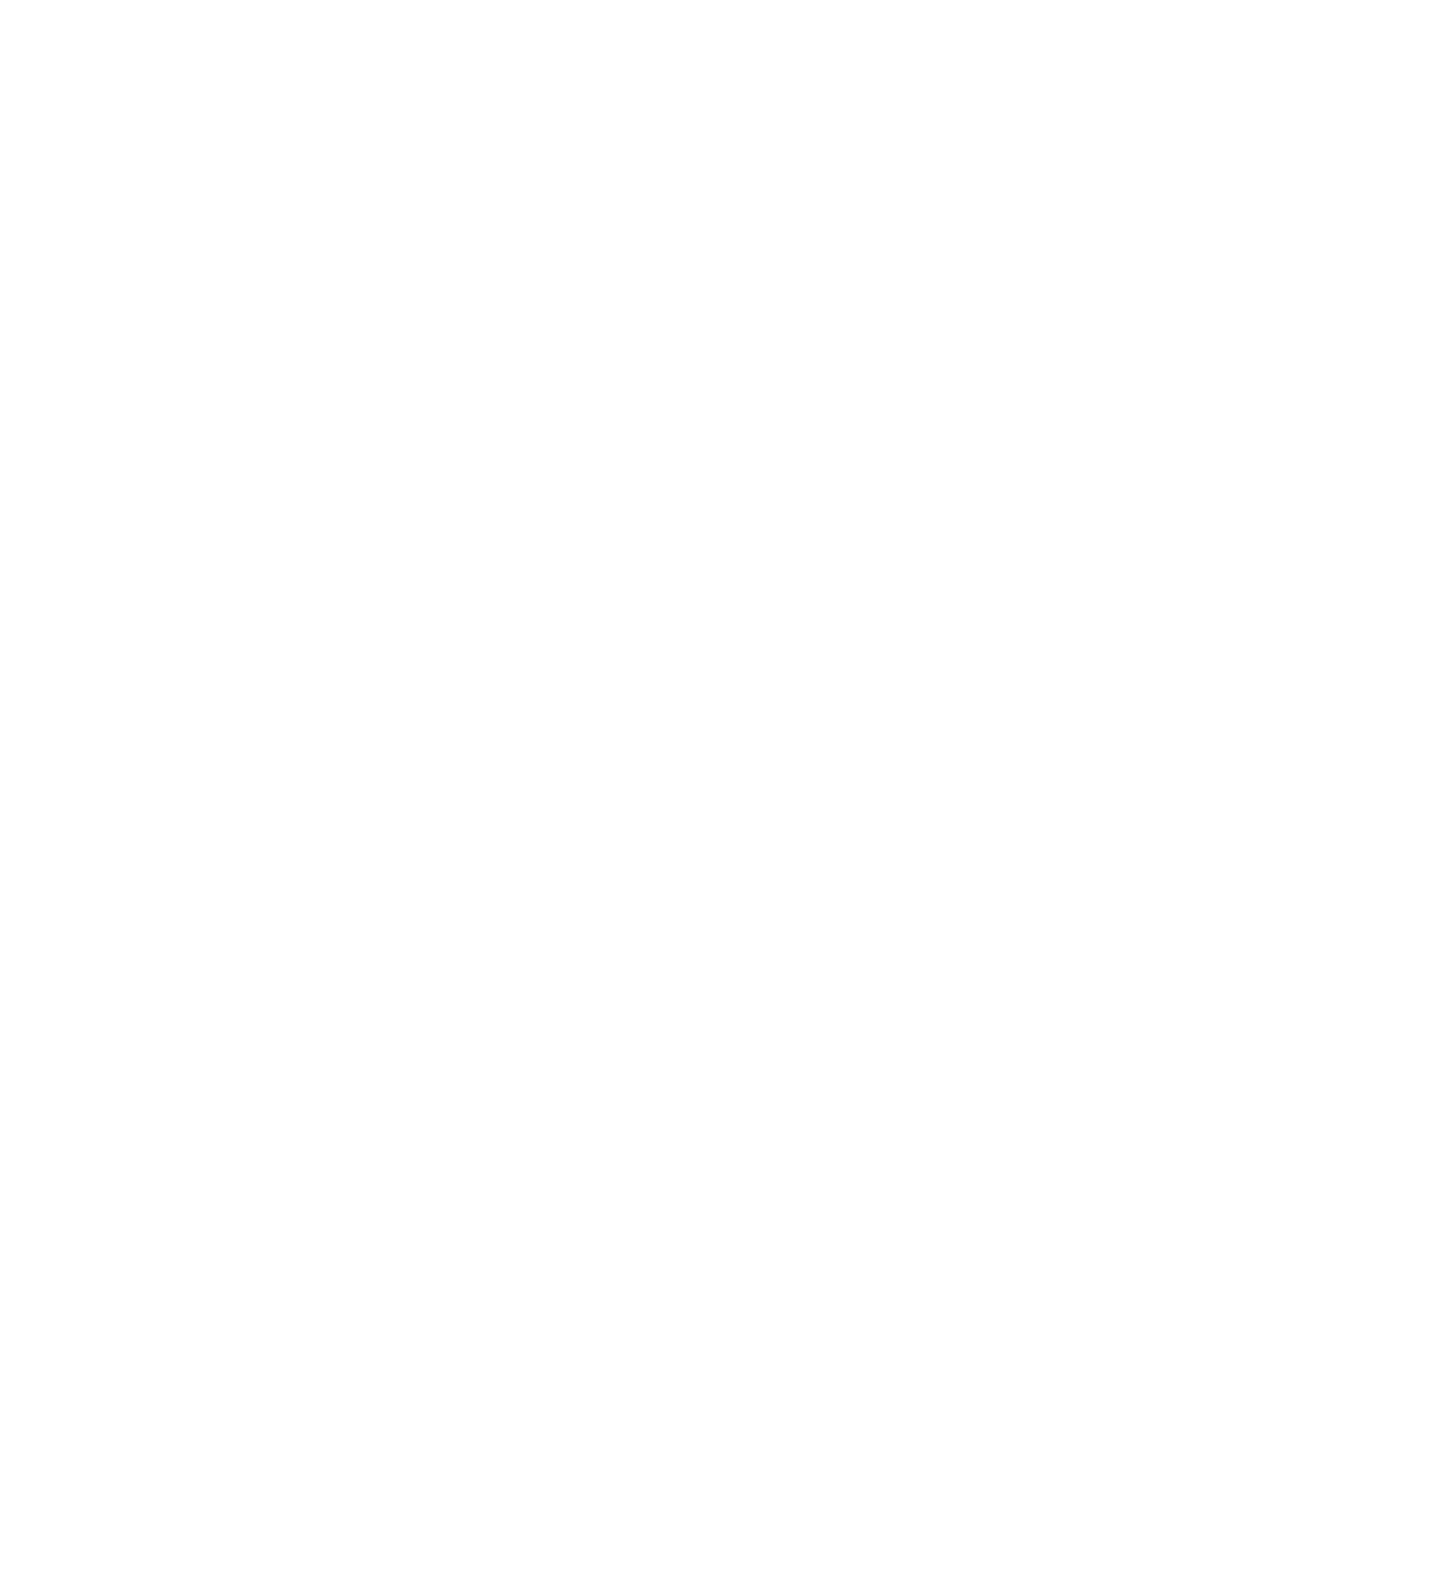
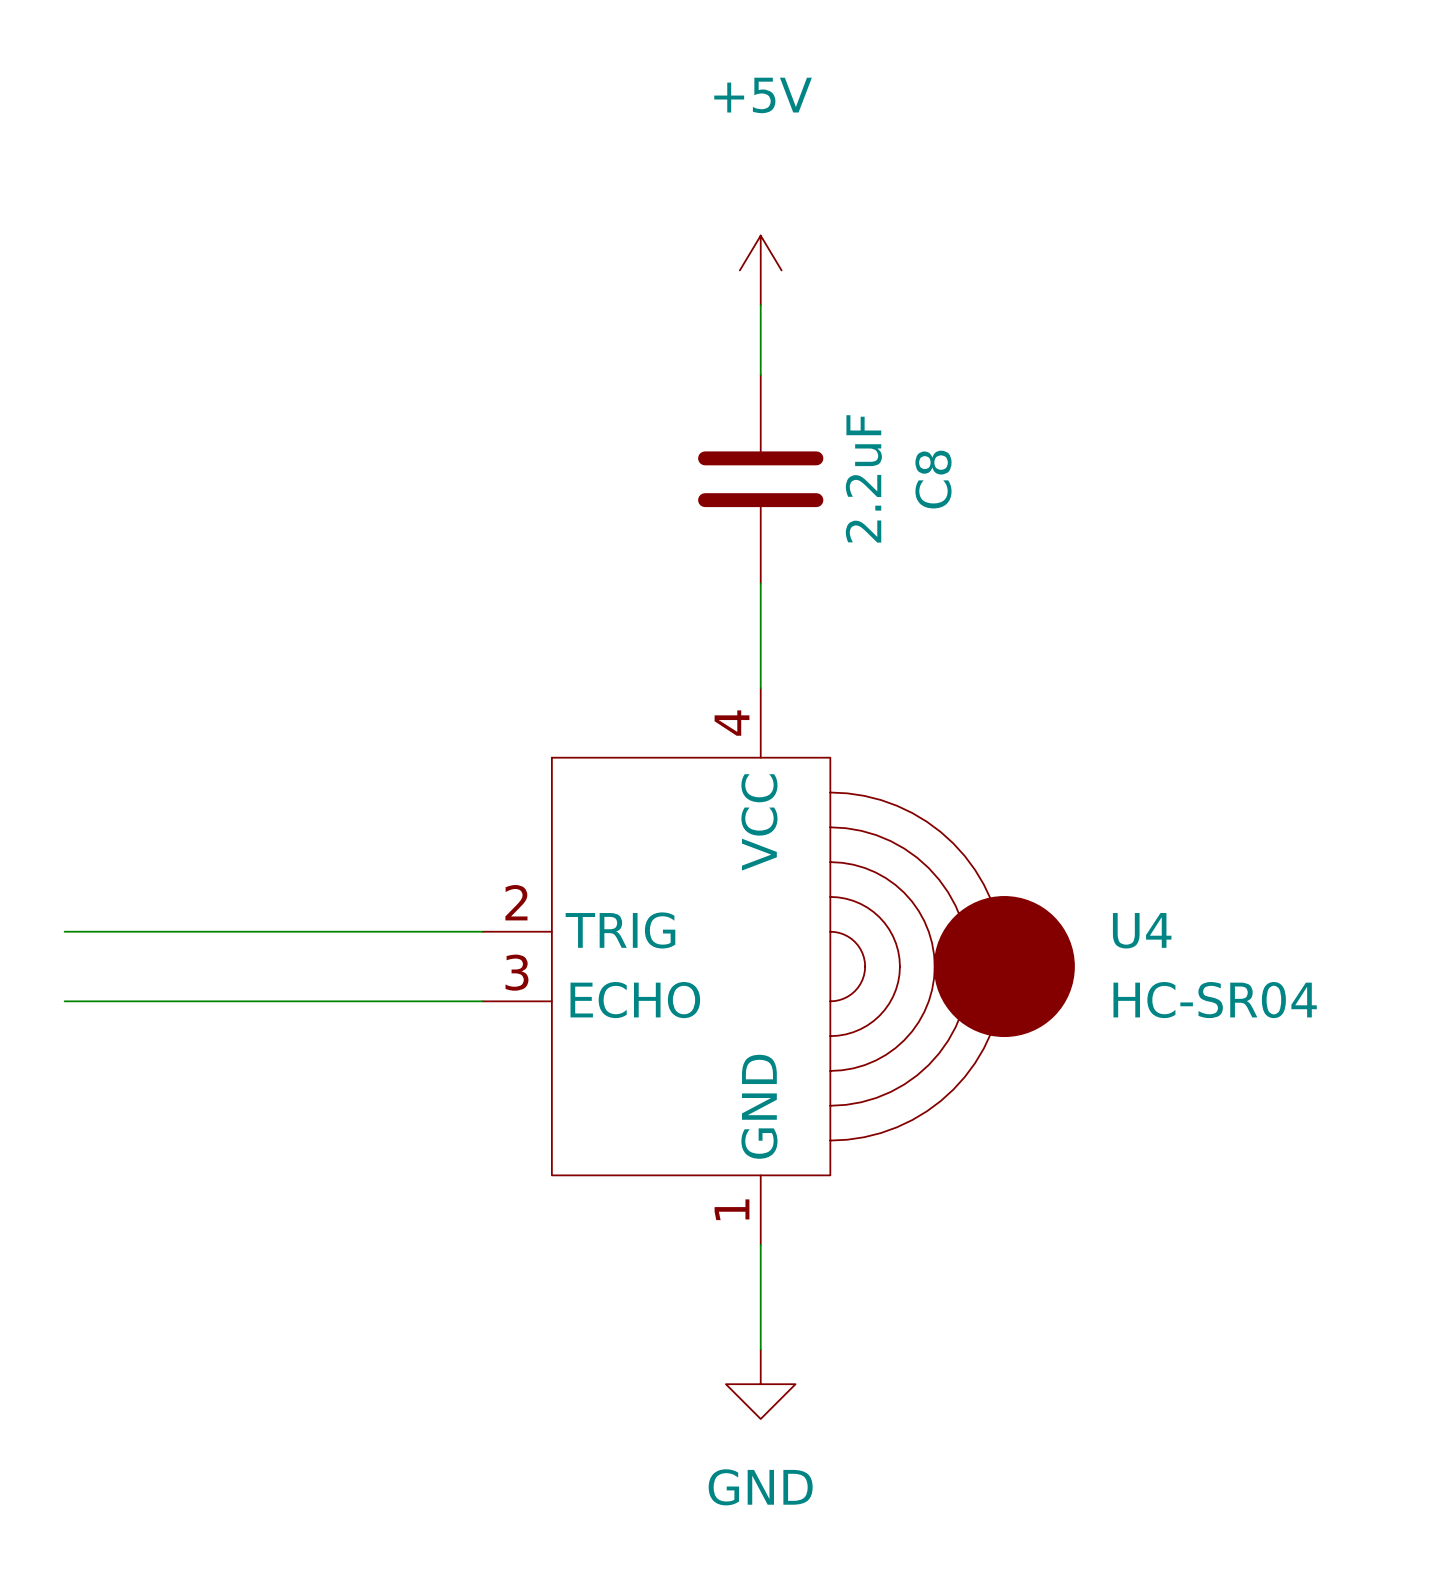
power symbol: none -> +5V (760, 270)
wire: none -> (760, 305) (760, 374)
C8: none -> 2.2uF (760, 479)
wire: none -> (760, 583) (760, 688)
wire: none -> (64, 931) (482, 931)
U4: none -> HC-SR04 (778, 966)
wire: none -> (64, 1001) (482, 1001)
wire: none -> (760, 1244) (760, 1349)
power symbol: none -> GND (760, 1384)

